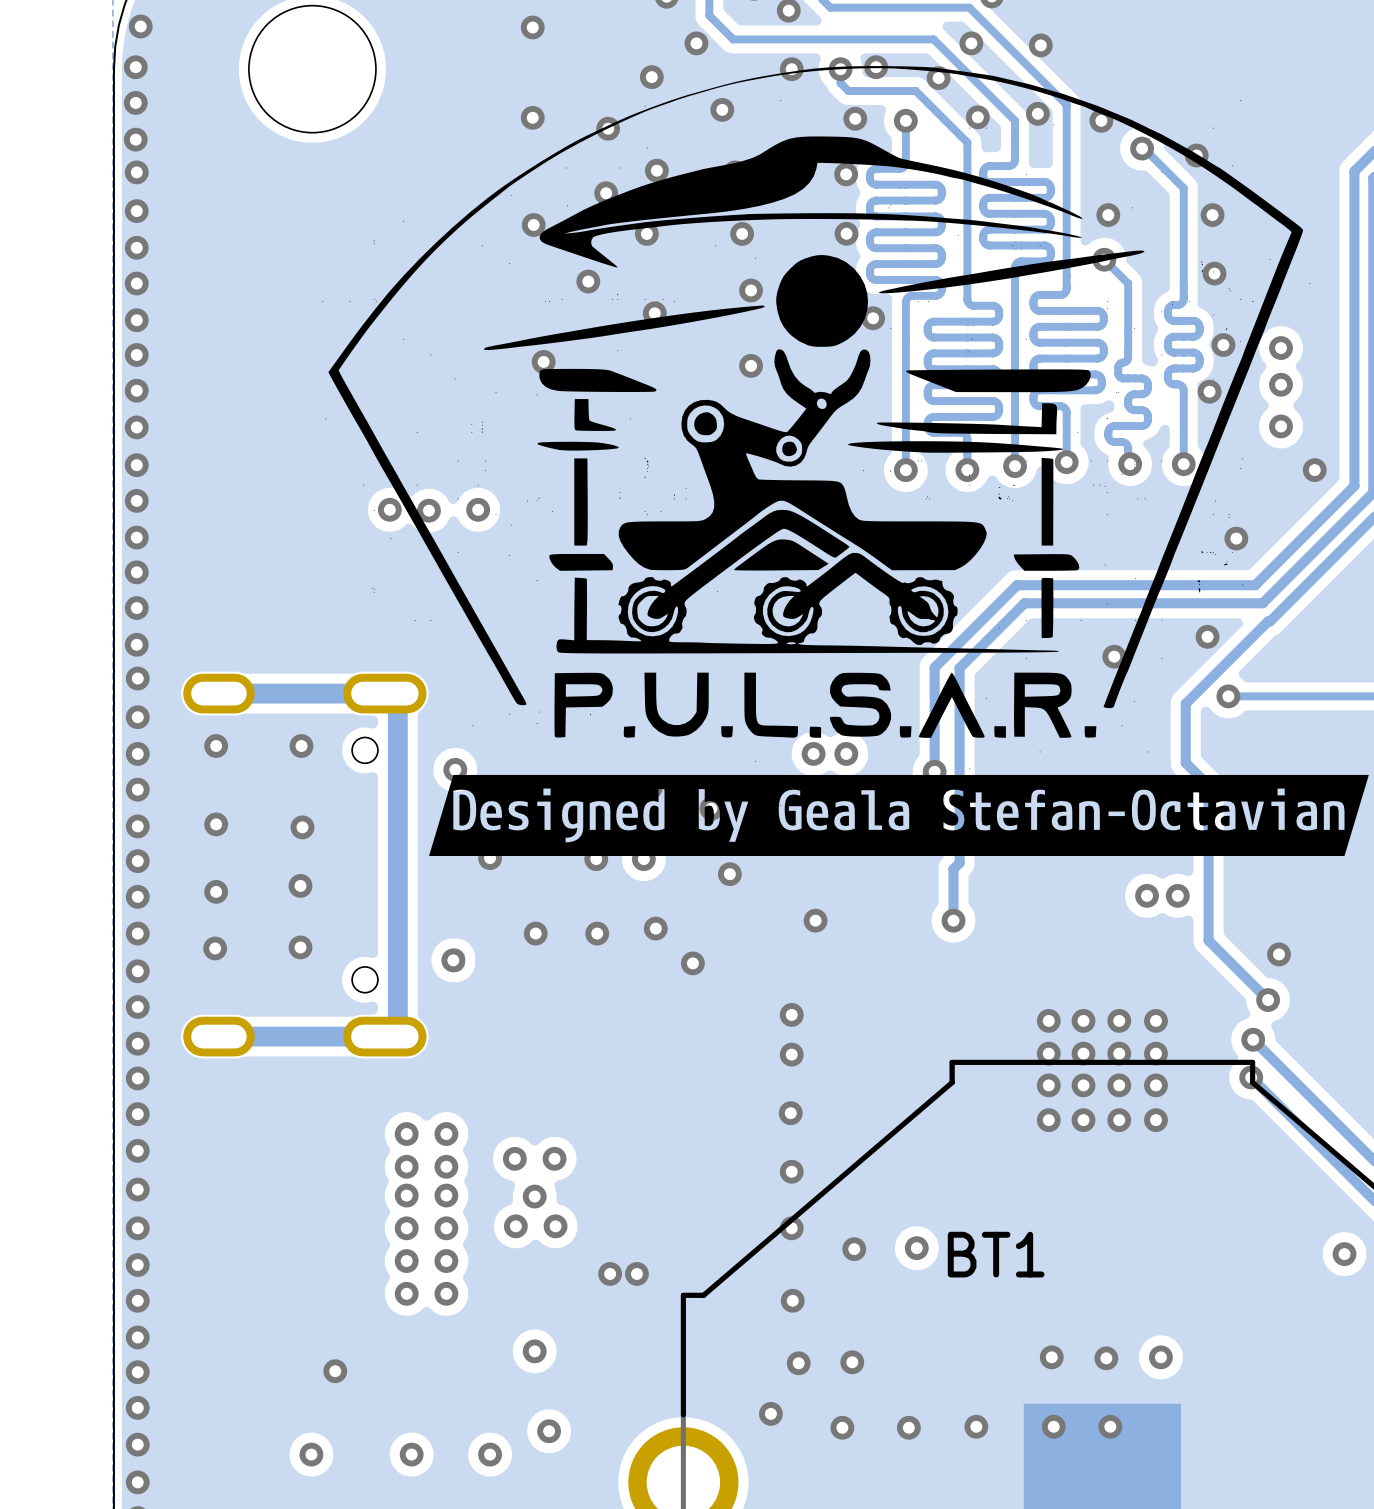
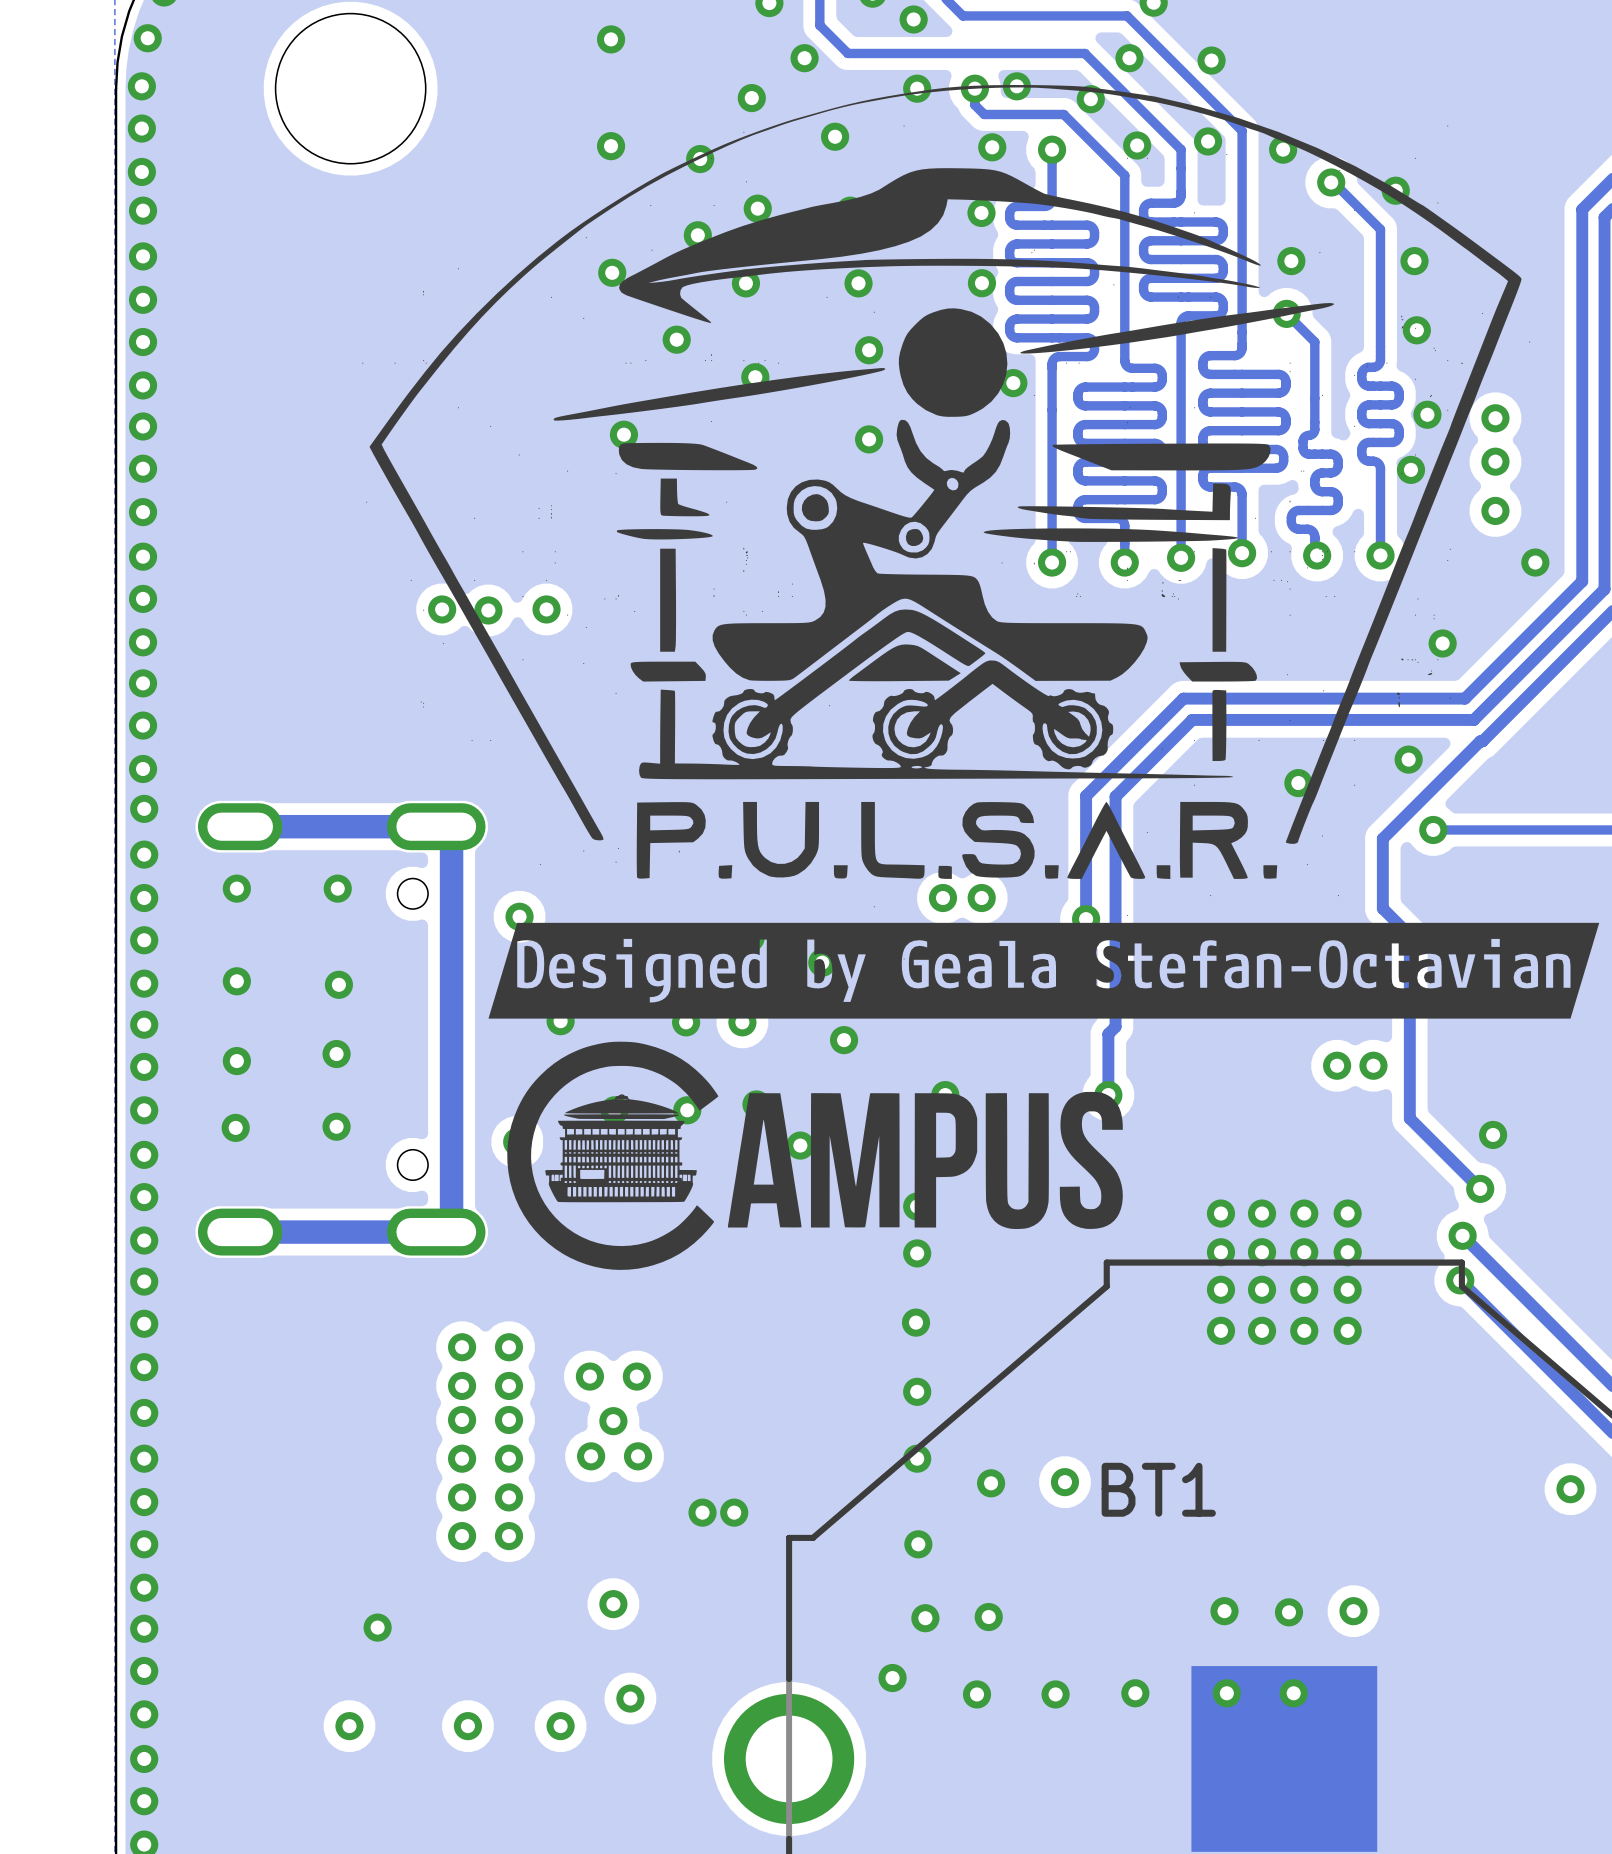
drawing: none -> [507, 1041, 1123, 1270]

